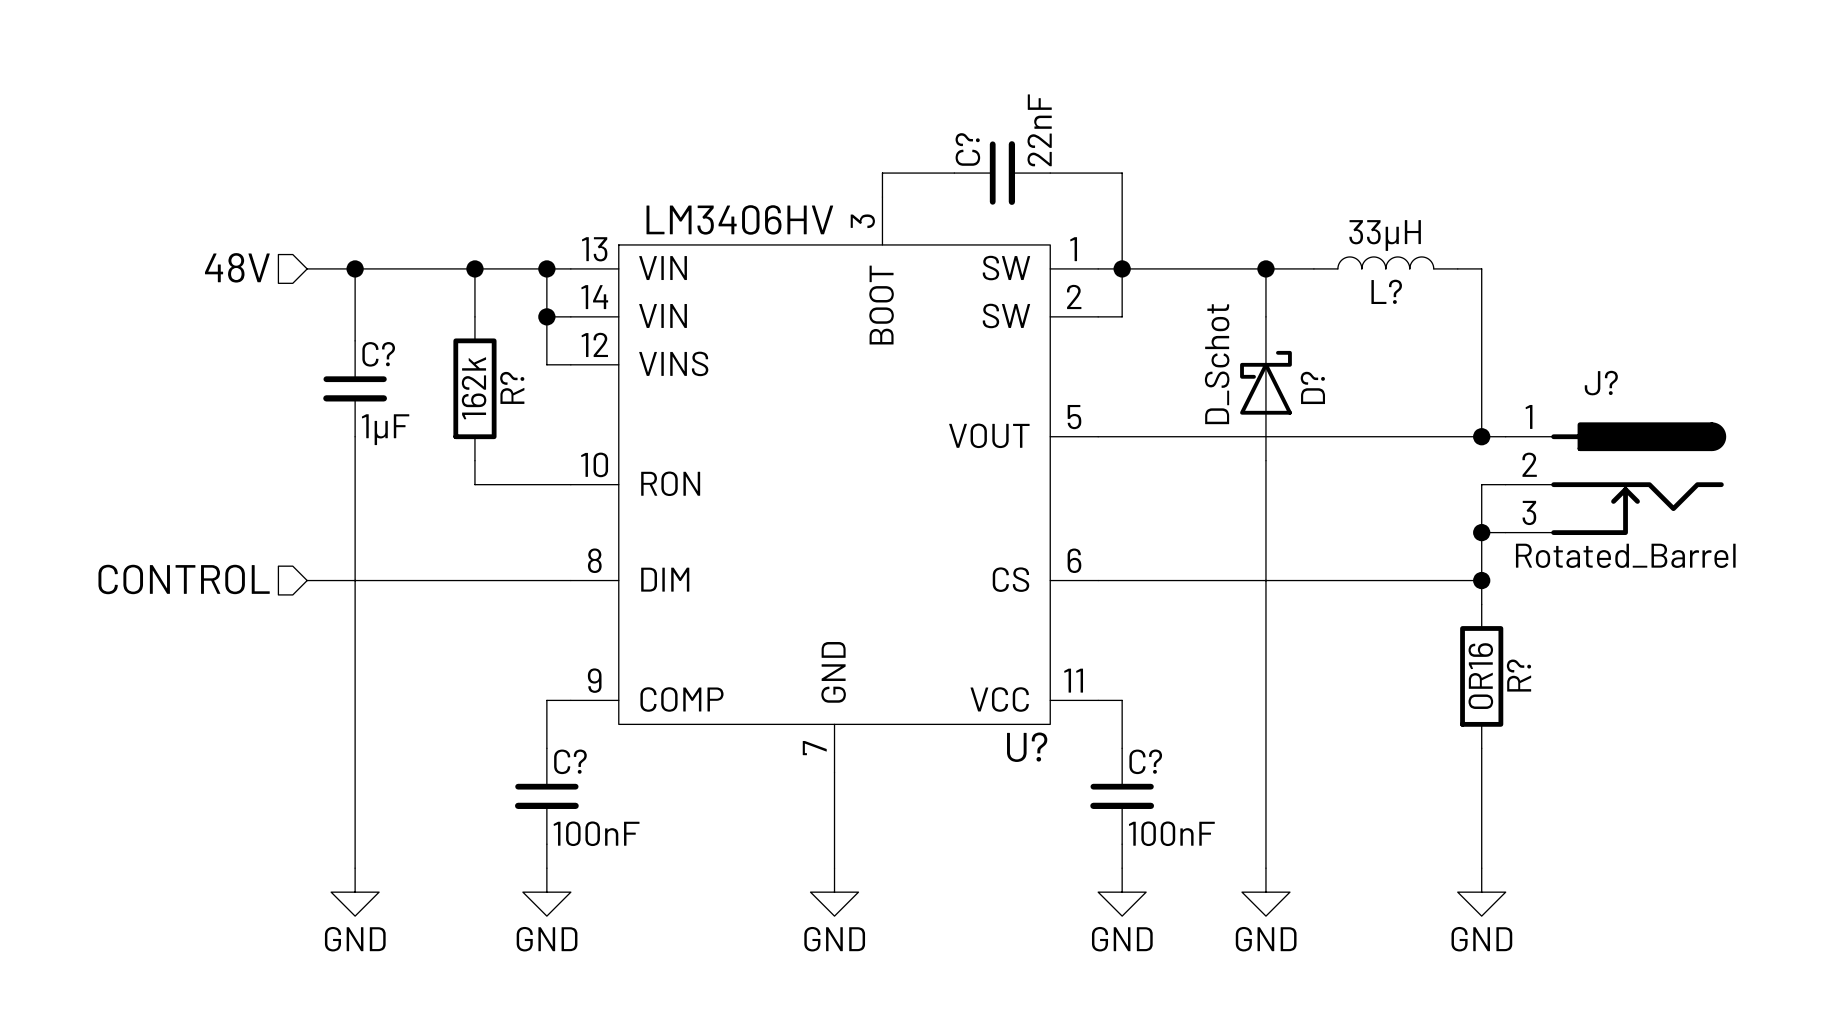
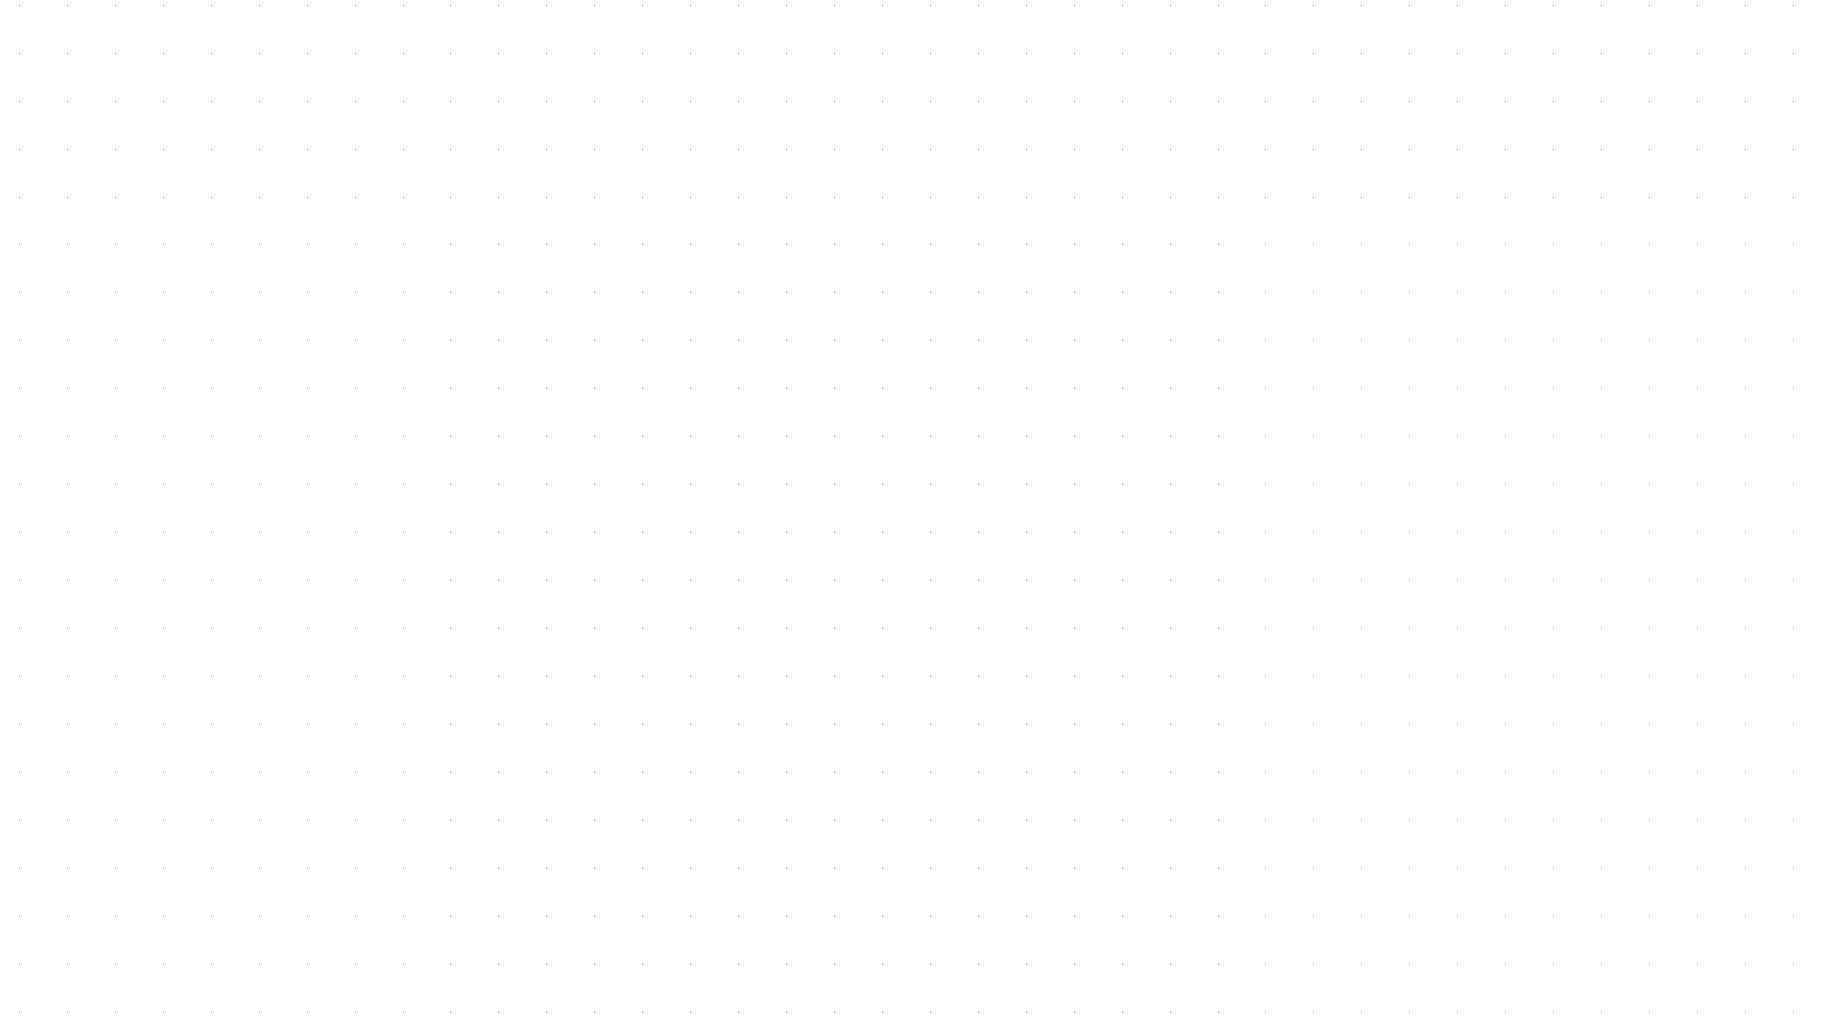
wire: (954, 173) (882, 173) (882, 197) -> none
C?: 22nF (1002, 173) -> none
wire: (1050, 173) (1122, 173) (1122, 316) (1098, 316) -> none
L?: 33μH (1385, 262) -> none
hierarchical label: 48V (237, 267) -> none
wire: (307, 268) (570, 268) -> none
wire: (355, 268) (355, 340) -> none
junction: (355, 268) -> none
wire: (474, 268) (474, 316) -> none
junction: (474, 268) -> none
wire: (546, 268) (546, 364) (570, 364) -> none
junction: (546, 268) -> none
wire: (1098, 268) (1313, 268) -> none
junction: (1122, 268) -> none
wire: (1265, 268) (1265, 316) -> none
junction: (1265, 268) -> none
wire: (1457, 268) (1481, 268) (1481, 436) -> none
wire: (546, 316) (570, 316) -> none
junction: (546, 316) -> none
C?: 1μF (355, 388) -> none
R?: 162k (474, 388) -> none
D?: D_Schot (1265, 388) -> none
wire: (355, 436) (355, 868) -> none
wire: (1098, 436) (1505, 436) -> none
junction: (1481, 436) -> none
wire: (474, 460) (474, 484) (570, 484) -> none
wire: (1265, 460) (1265, 868) -> none
J?: Rotated_Barrel (1615, 478) -> none
U?: LM3406HV (834, 484) -> none
wire: (1505, 484) (1481, 484) (1481, 604) -> none
wire: (1481, 532) (1505, 532) -> none
junction: (1481, 532) -> none
hierarchical label: CONTROL (184, 579) -> none
wire: (307, 580) (570, 580) -> none
wire: (1098, 580) (1481, 580) -> none
junction: (1481, 580) -> none
R?: 0R16 (1481, 676) -> none
wire: (570, 700) (546, 700) (546, 748) -> none
wire: (1098, 700) (1122, 700) (1122, 748) -> none
wire: (1481, 748) (1481, 868) -> none
wire: (834, 772) (834, 868) -> none
C?: 100nF (546, 796) -> none
C?: 100nF (1122, 796) -> none
wire: (546, 844) (546, 868) -> none
wire: (1122, 844) (1122, 868) -> none
power symbol: GND (355, 892) -> none
power symbol: GND (546, 892) -> none
power symbol: GND (834, 892) -> none
power symbol: GND (1122, 892) -> none
power symbol: GND (1265, 892) -> none
power symbol: GND (1481, 892) -> none

